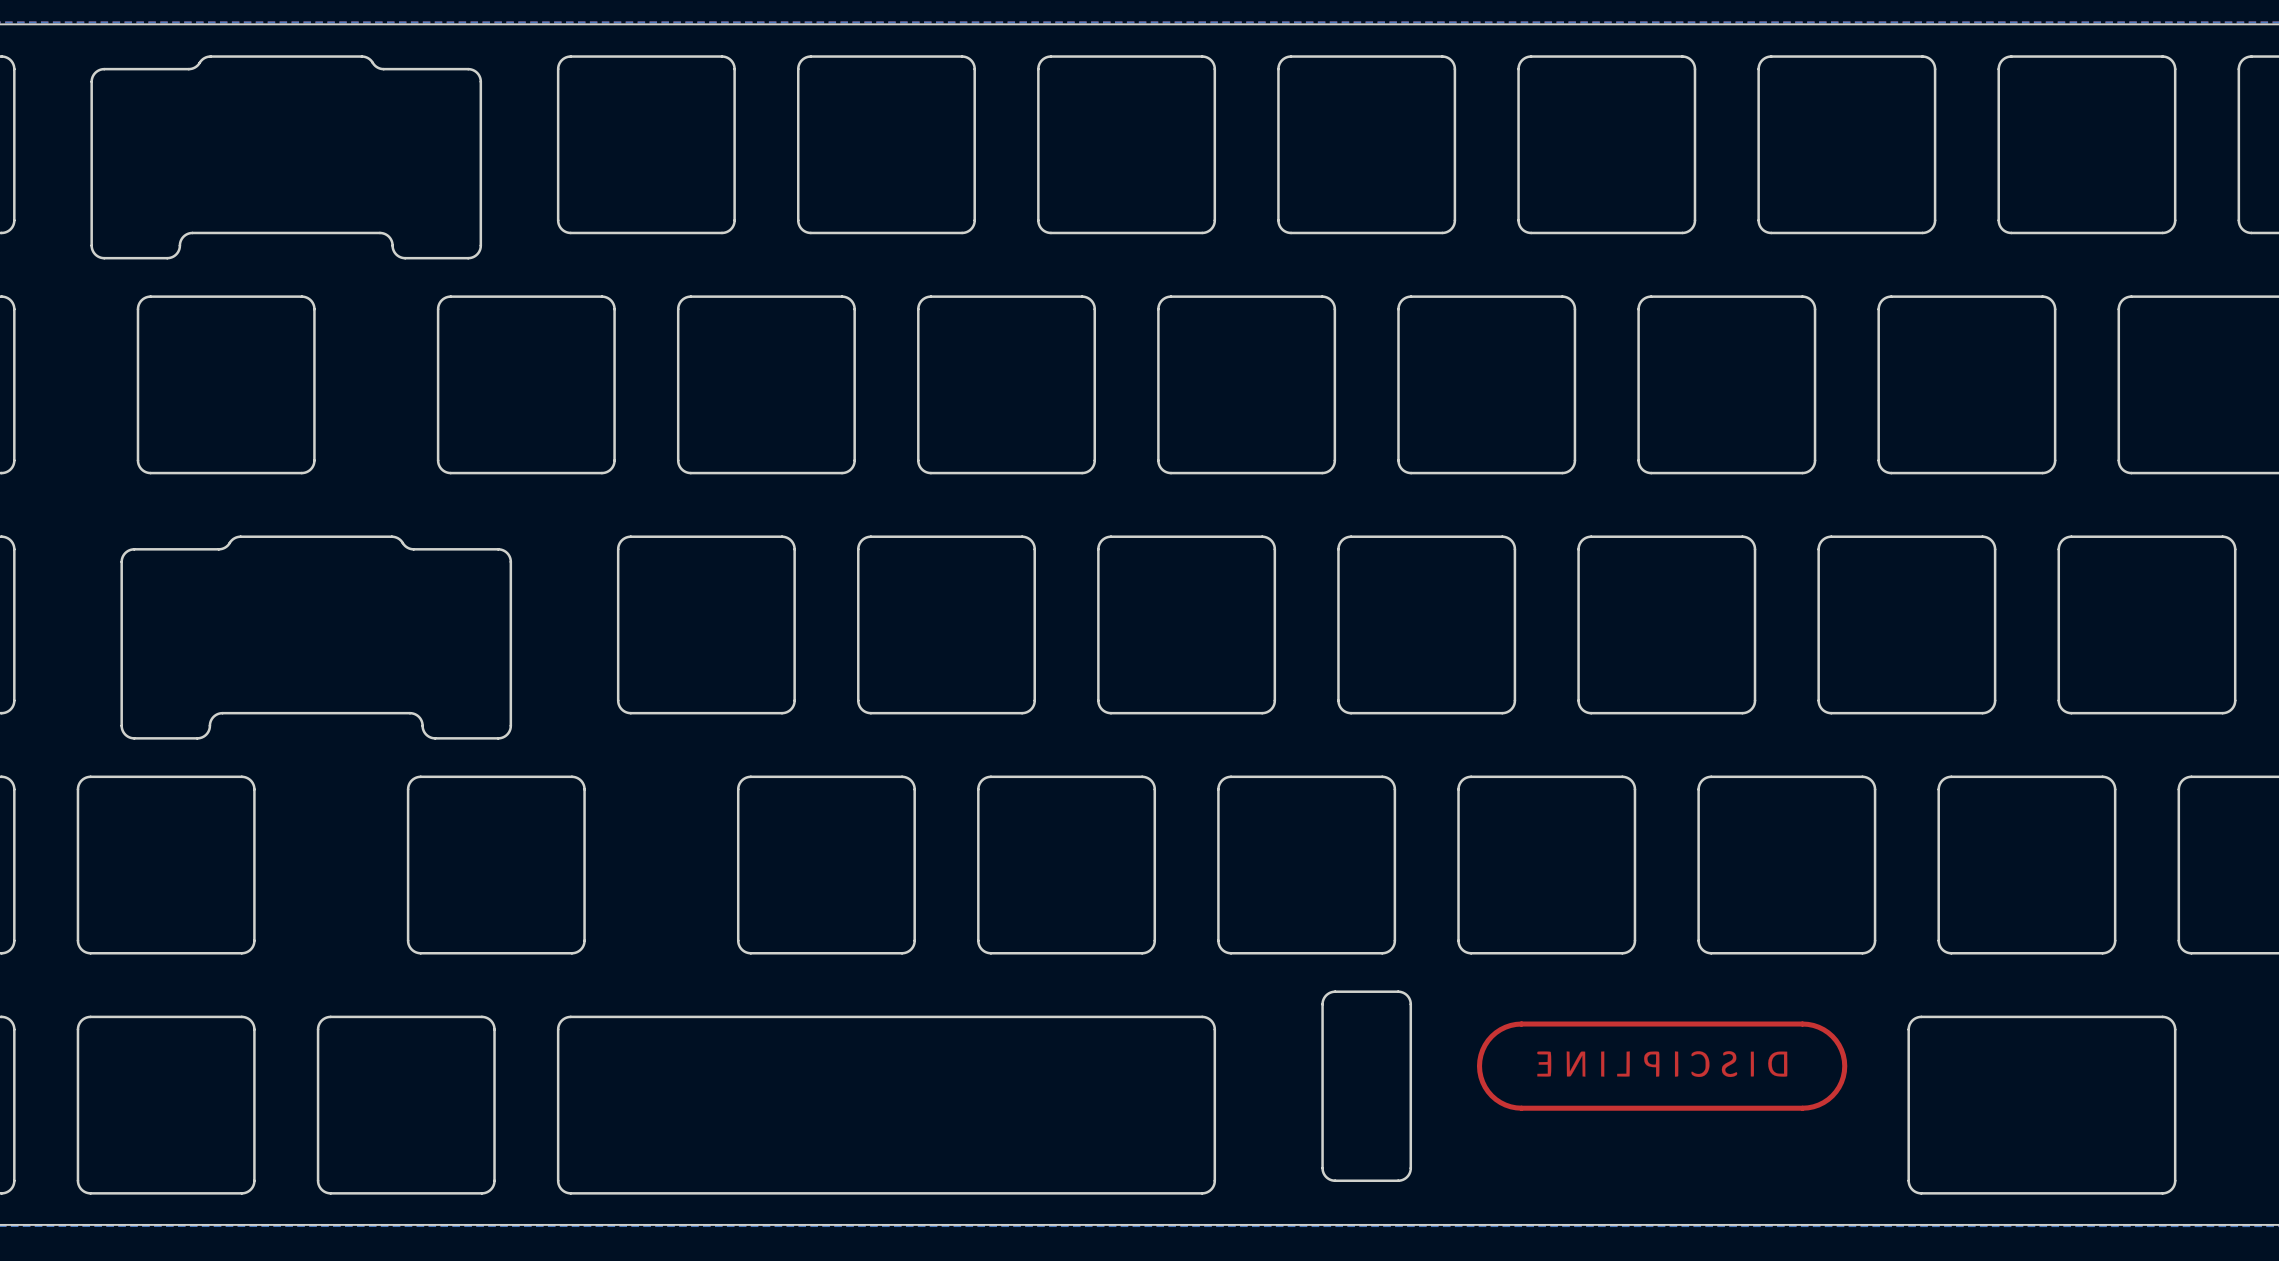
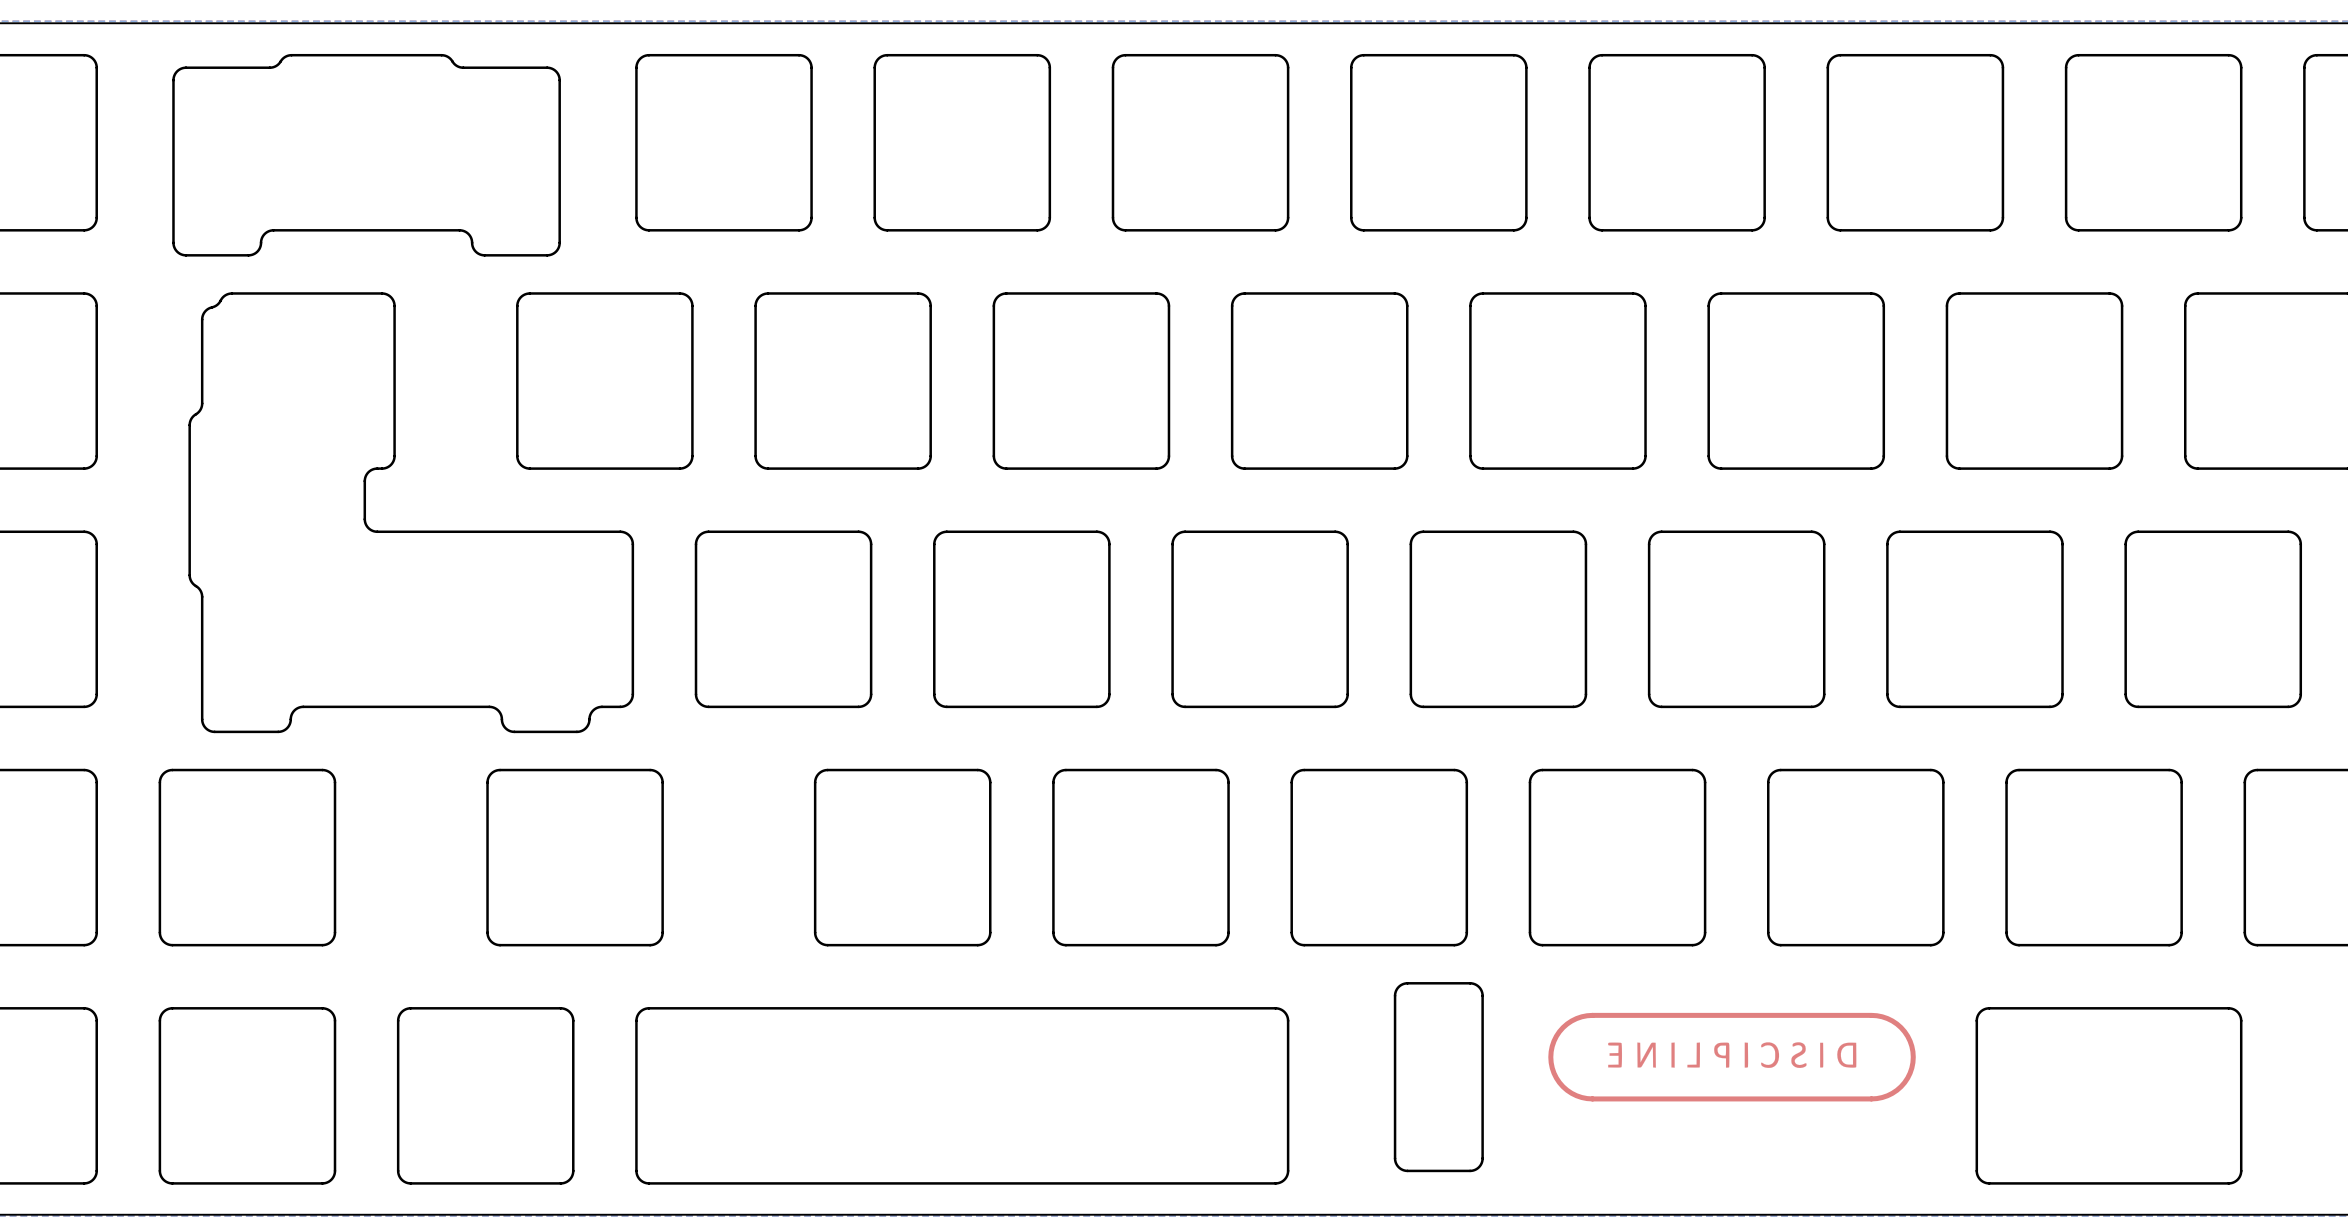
board edge: (150, 296) (141, 300) (137, 309) (137, 460) (140, 468) (150, 473) (297, 473) -> (231, 293) (224, 296) (218, 304) (206, 309) (202, 315) (202, 404) (189, 423) (189, 575) (191, 581) (199, 589) (202, 595) (202, 721) (205, 728) (213, 731) (279, 731) (288, 726) (294, 710) (303, 706)
board edge: (297, 536) (238, 536) (220, 549) (132, 549) (126, 551) (122, 557) (121, 725) (123, 732) (132, 738) (198, 738) (207, 733) (213, 716) (222, 713) -> (377, 531) (368, 528) (364, 519) (365, 477) (369, 471) (377, 468)
board edge: (391, 536) (398, 538) (411, 549) (499, 549) (509, 555) (510, 561) (510, 725) (507, 734) (498, 738) -> (471, 531) (620, 531) (626, 533) (631, 538) (632, 544) (632, 697) (629, 703) (623, 706) (595, 708) (590, 714) (586, 727) (576, 731)

